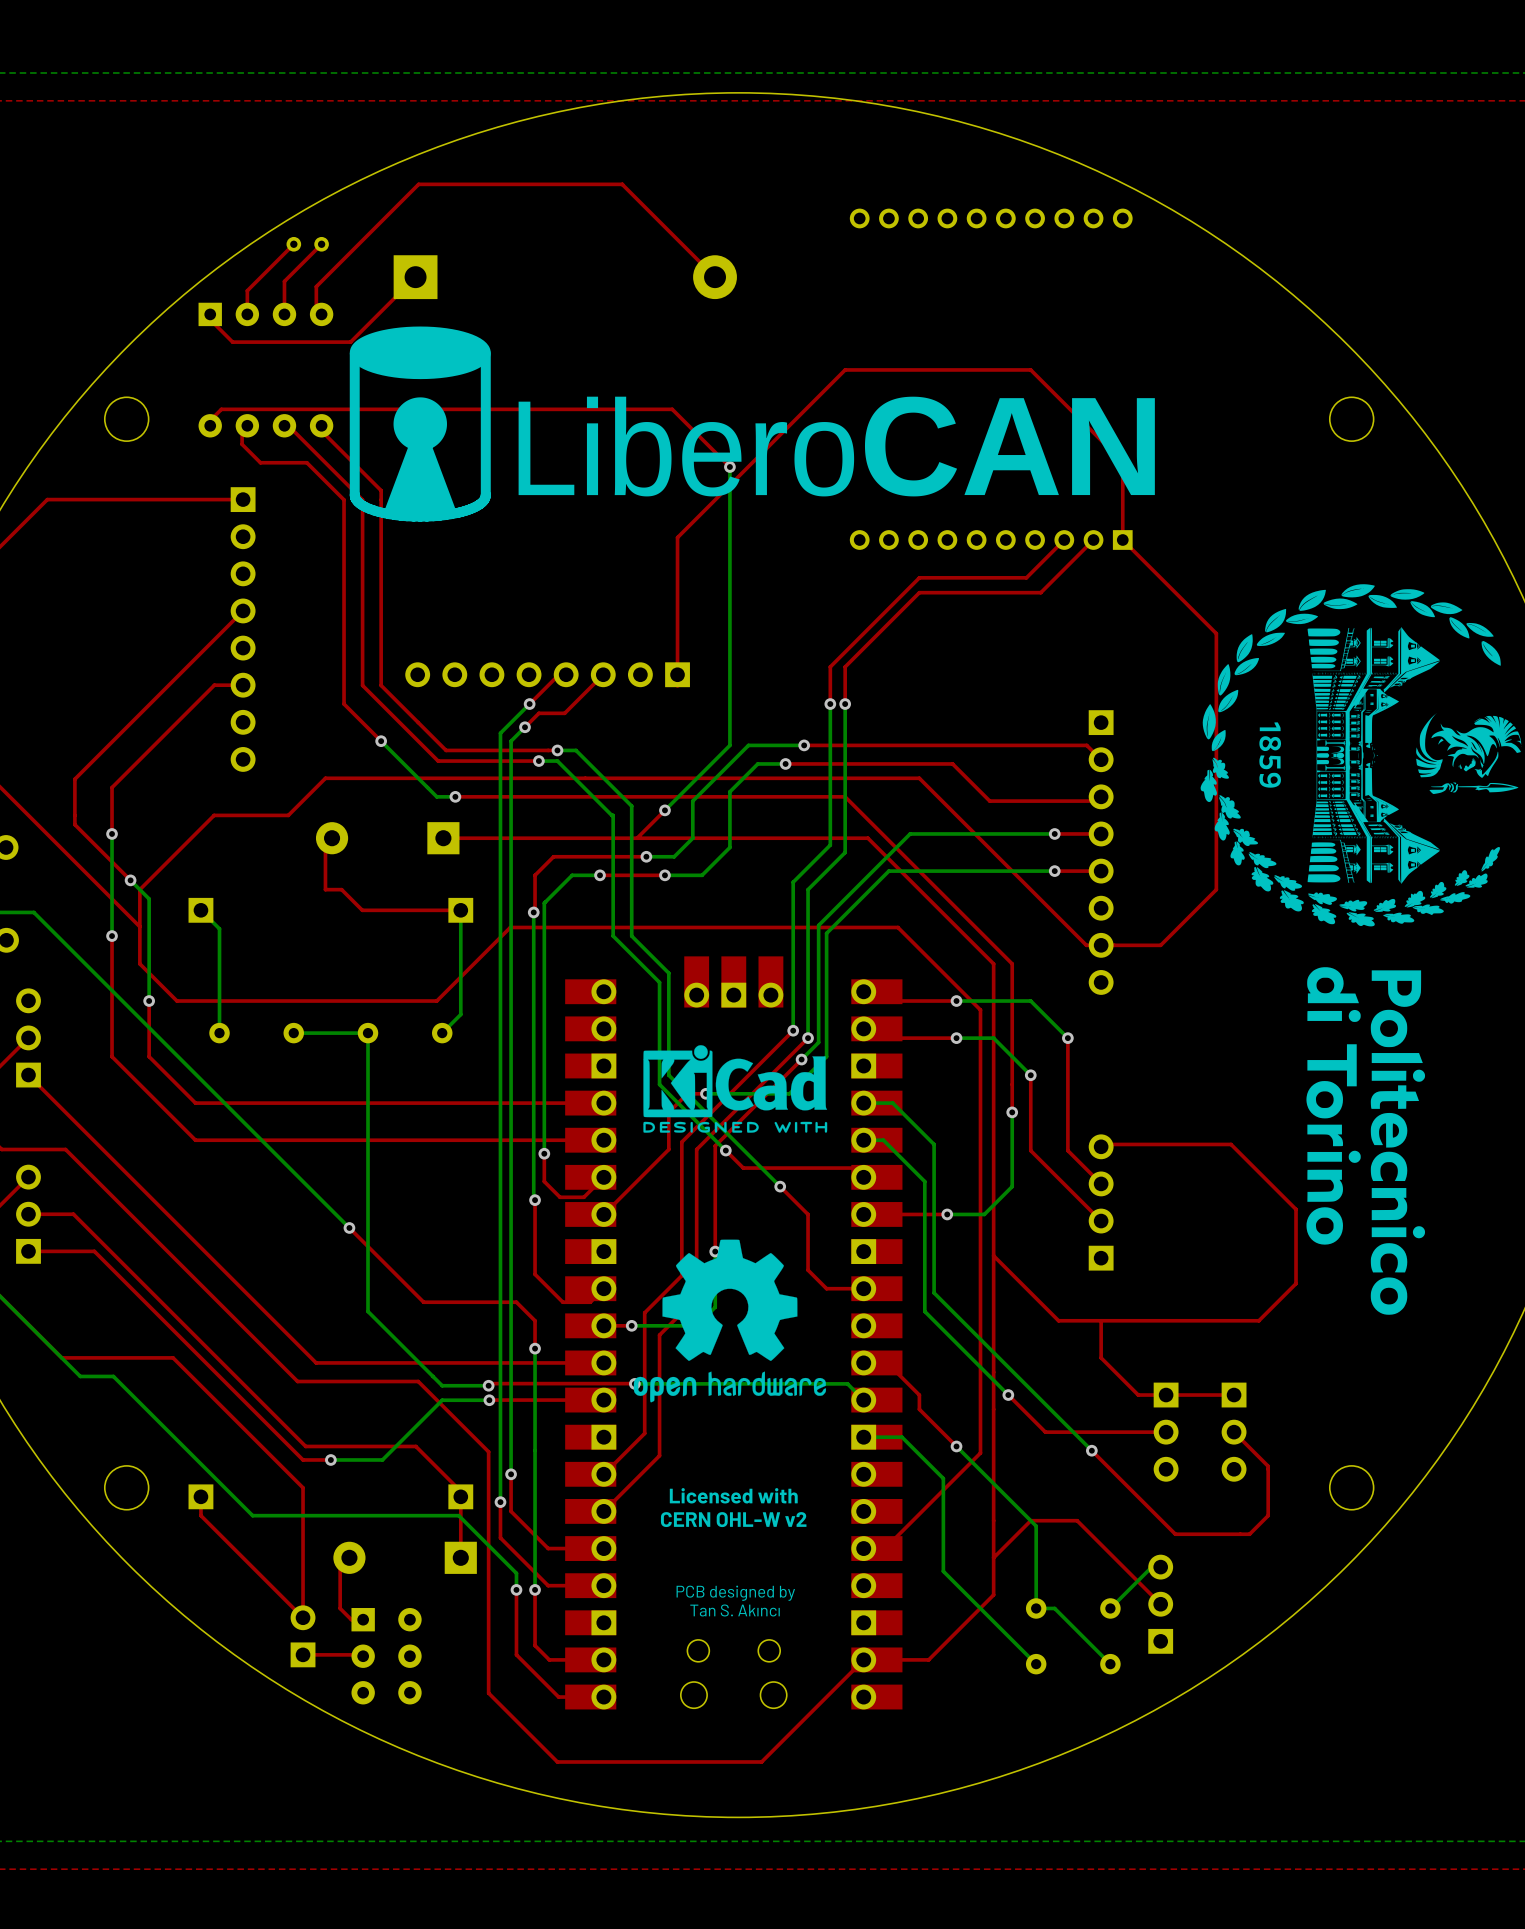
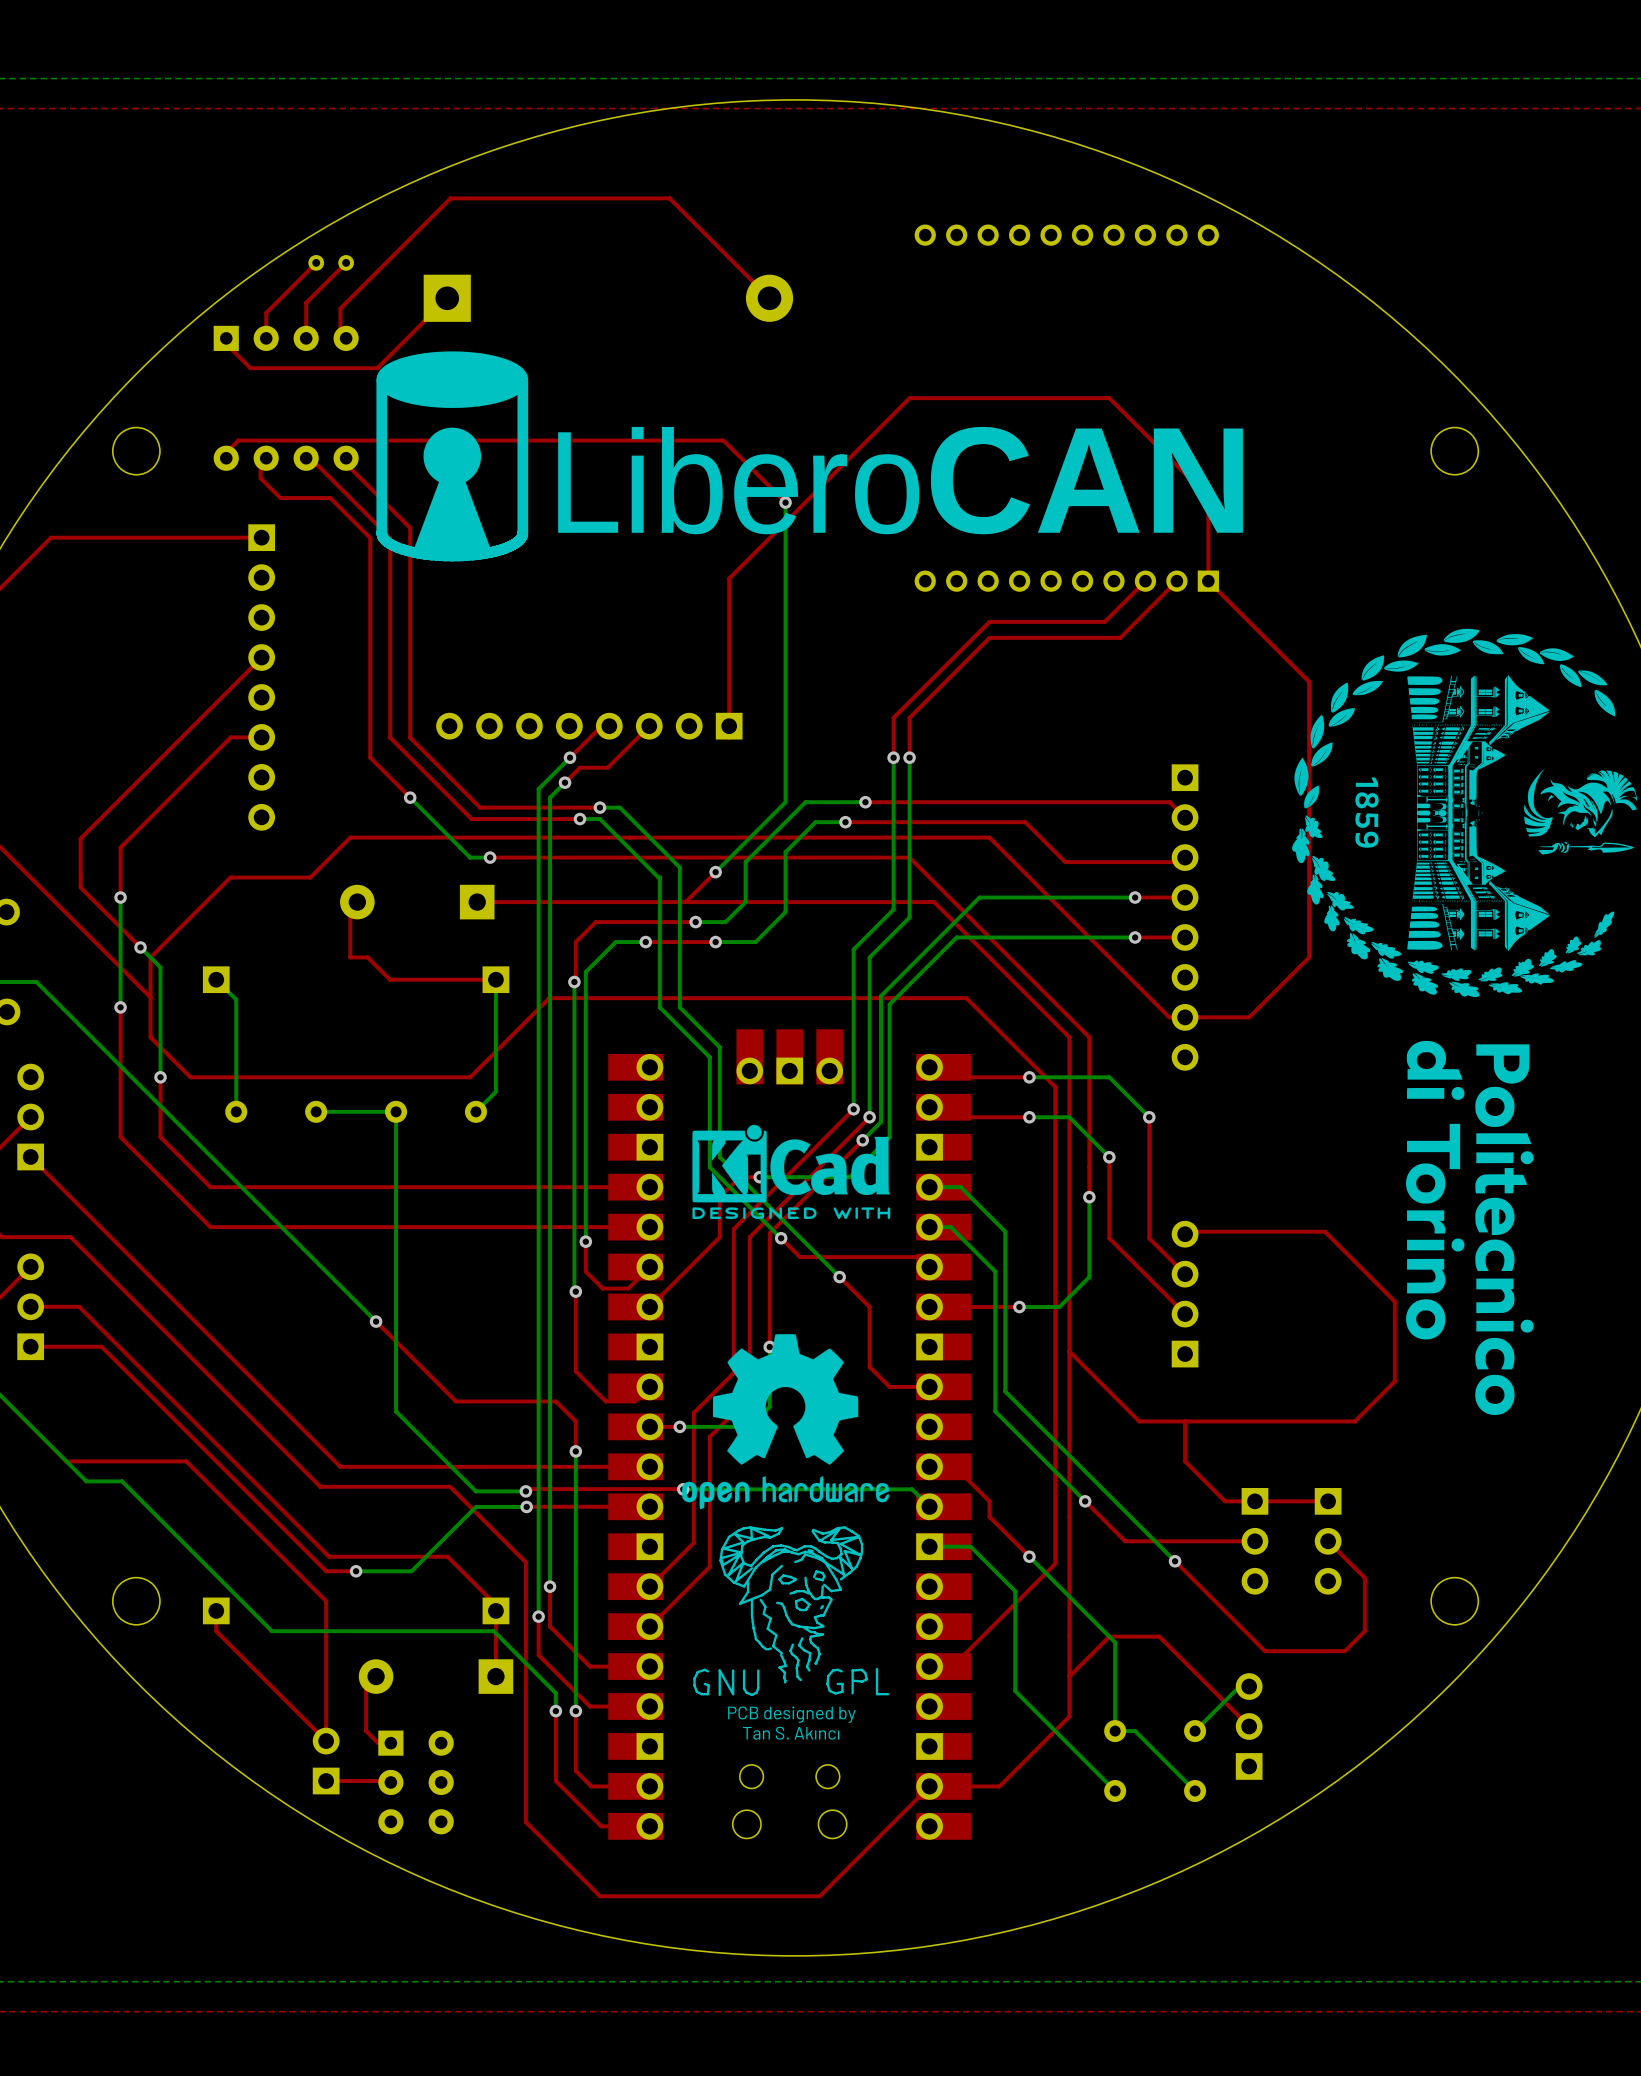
drawing: none -> [693, 1526, 890, 1697]
text: Licensed with (733, 1495) -> none
text: CERN OHL-W v2 (733, 1519) -> none

